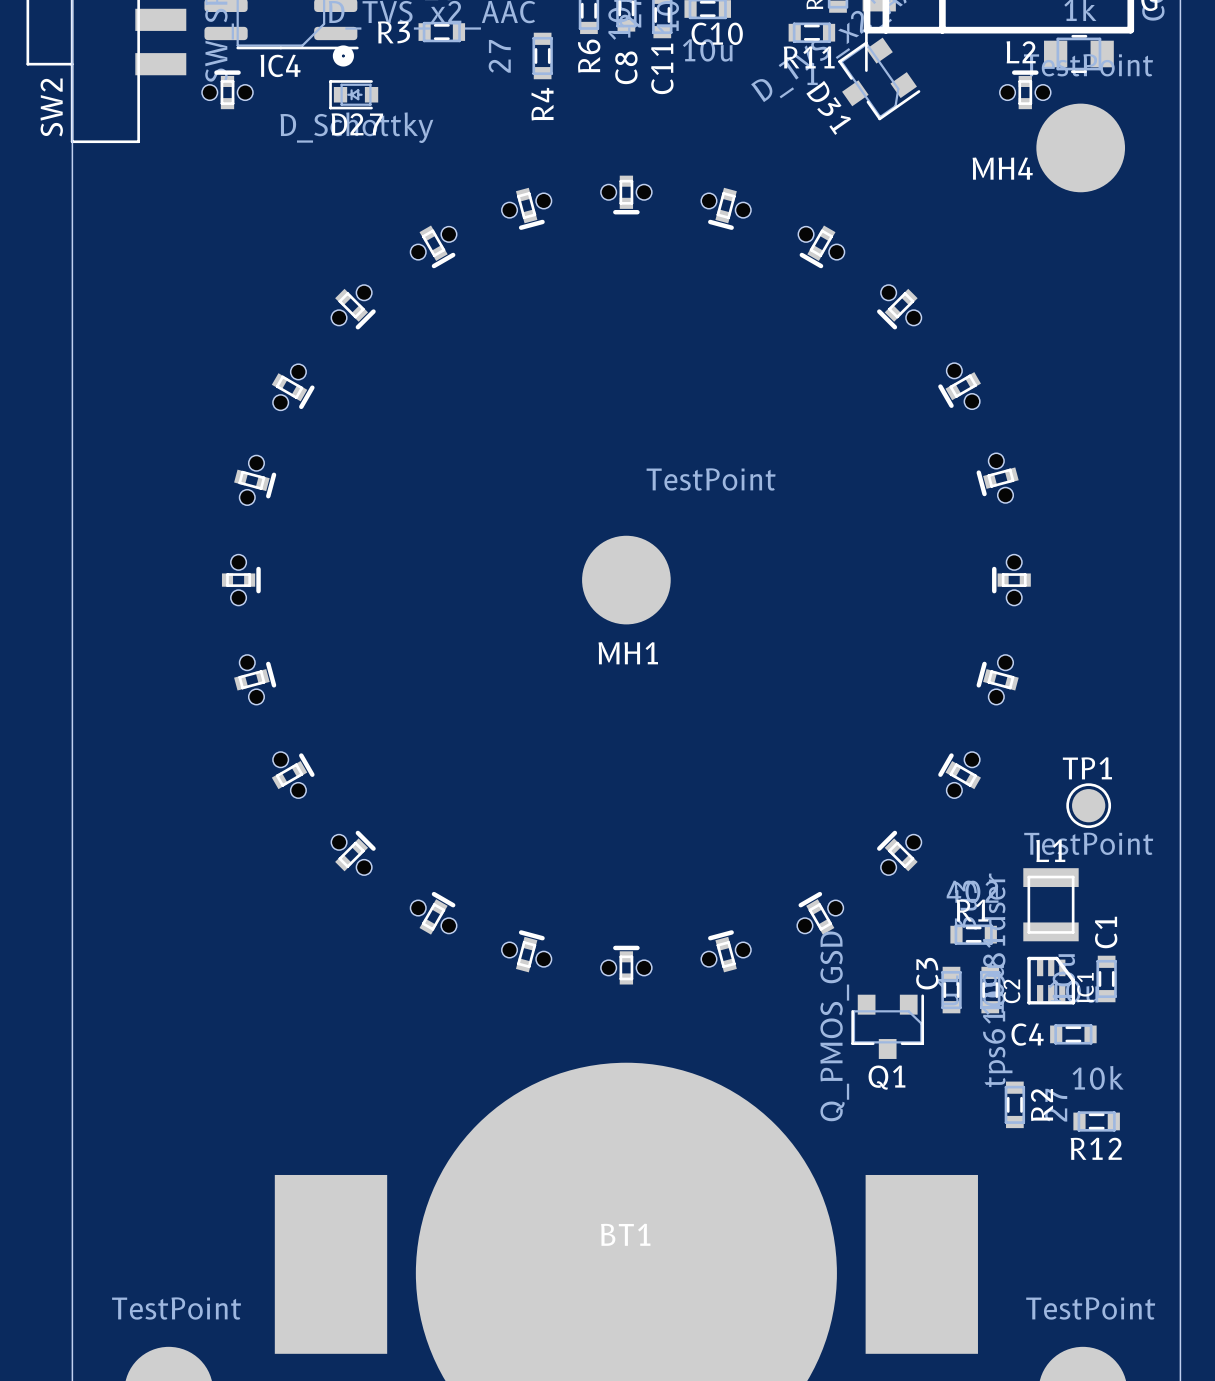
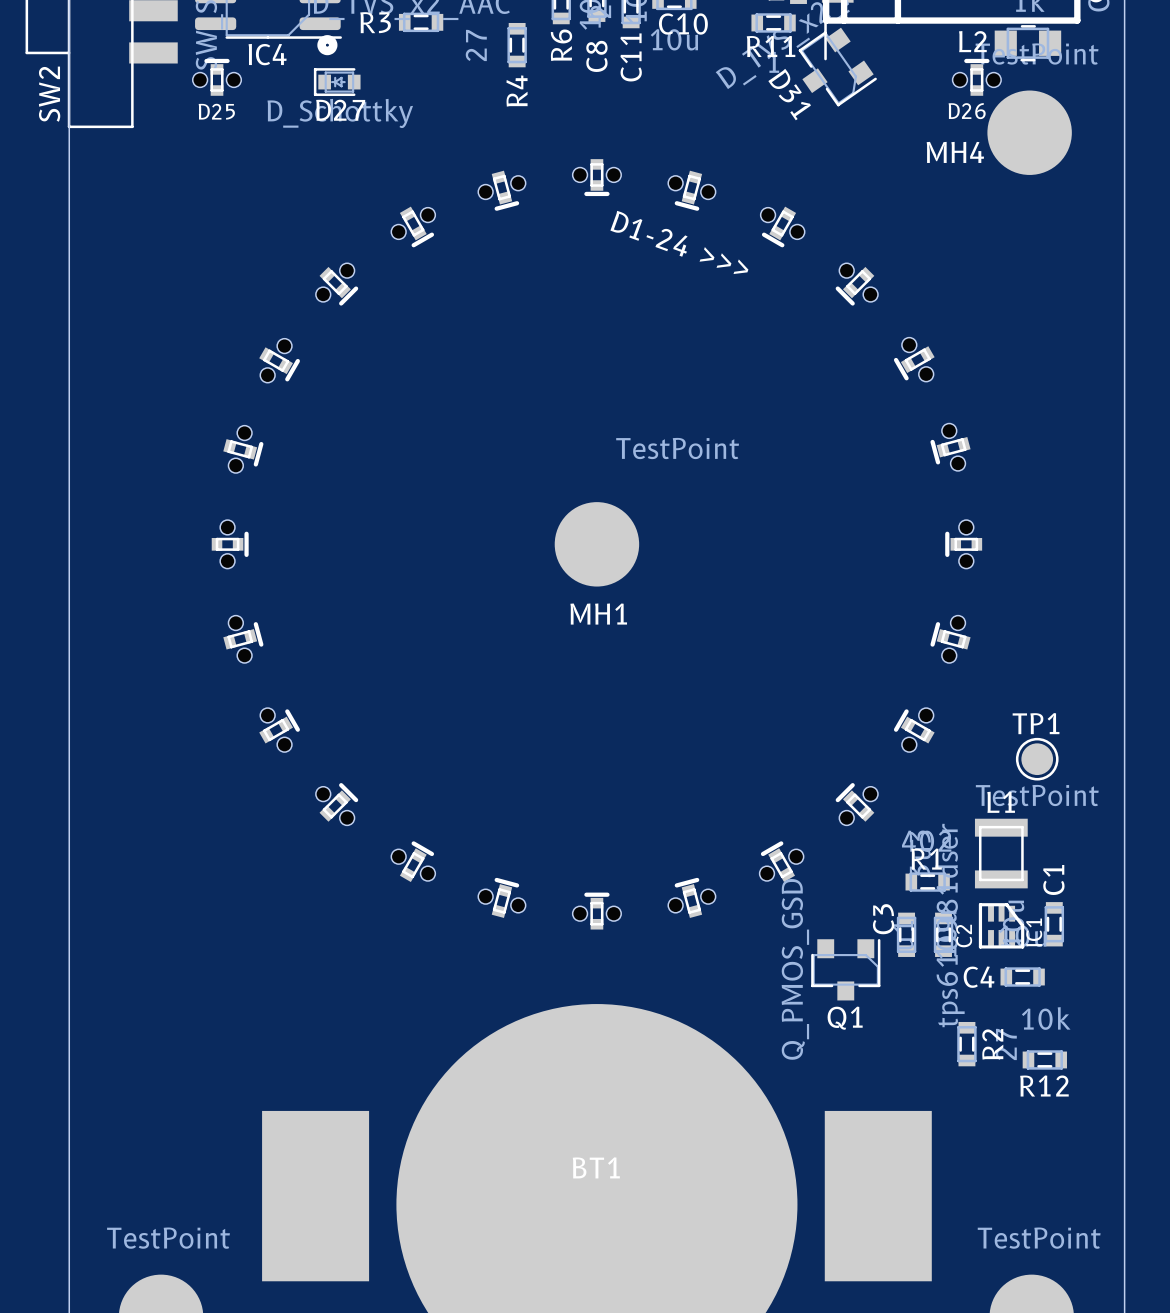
D25 name: none -> D25 (216, 111)
D26 name: none -> D26 (967, 111)
text: none -> D1-24 >>> (679, 242)

